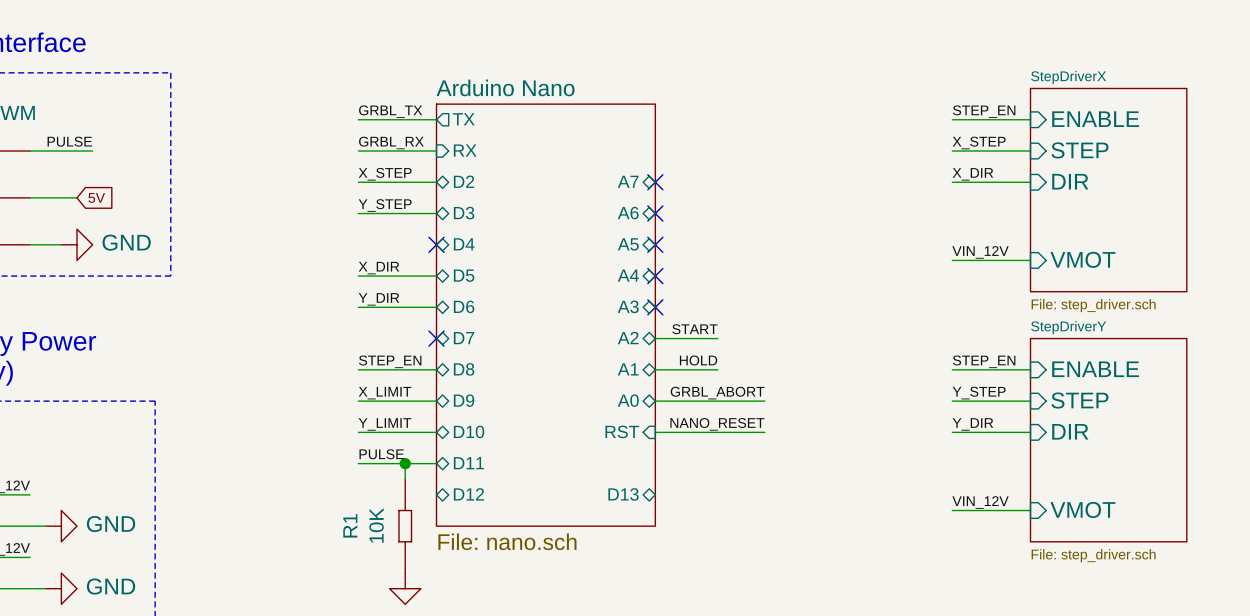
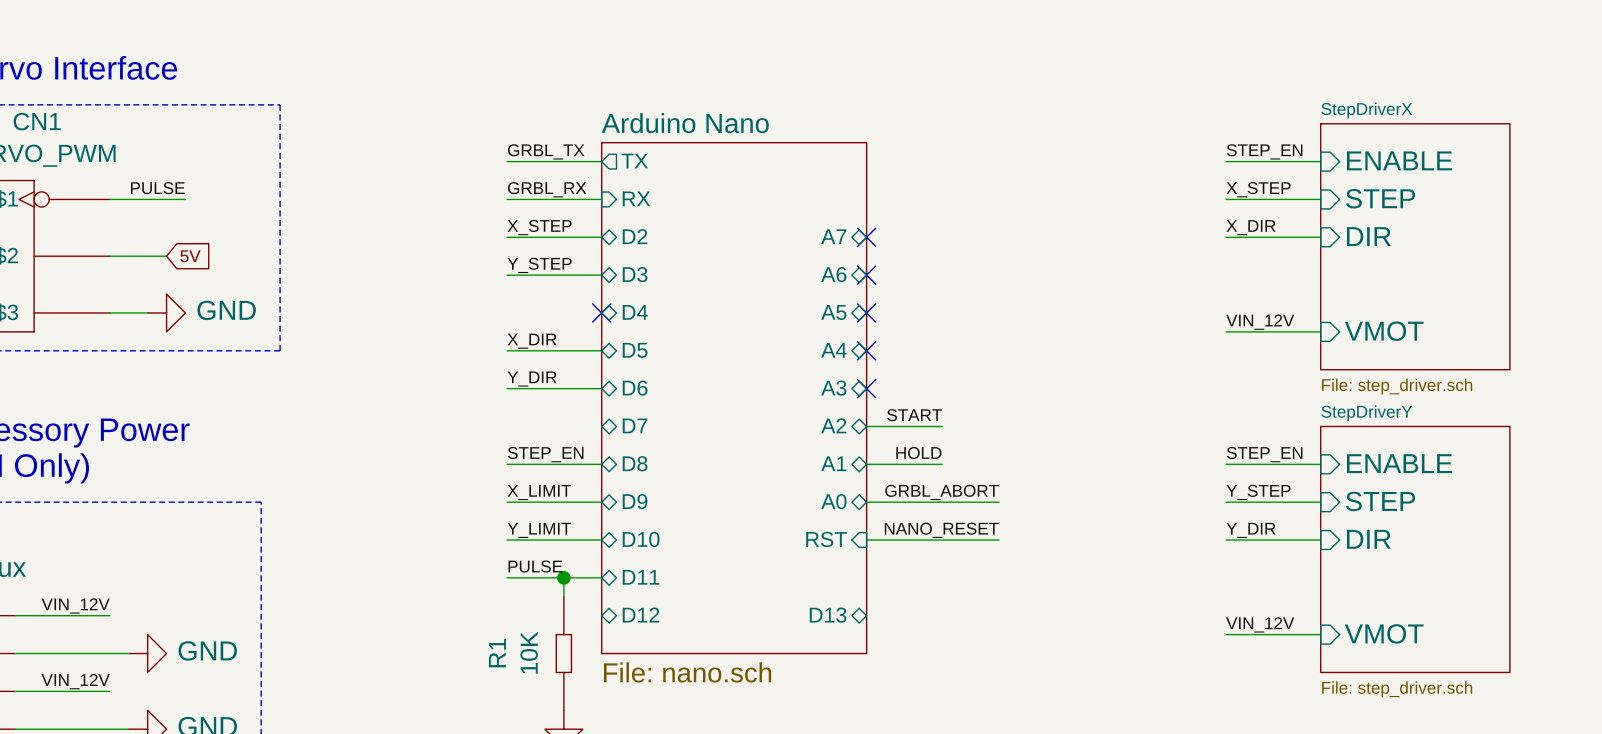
no-connect mark: (436, 338) -> none

